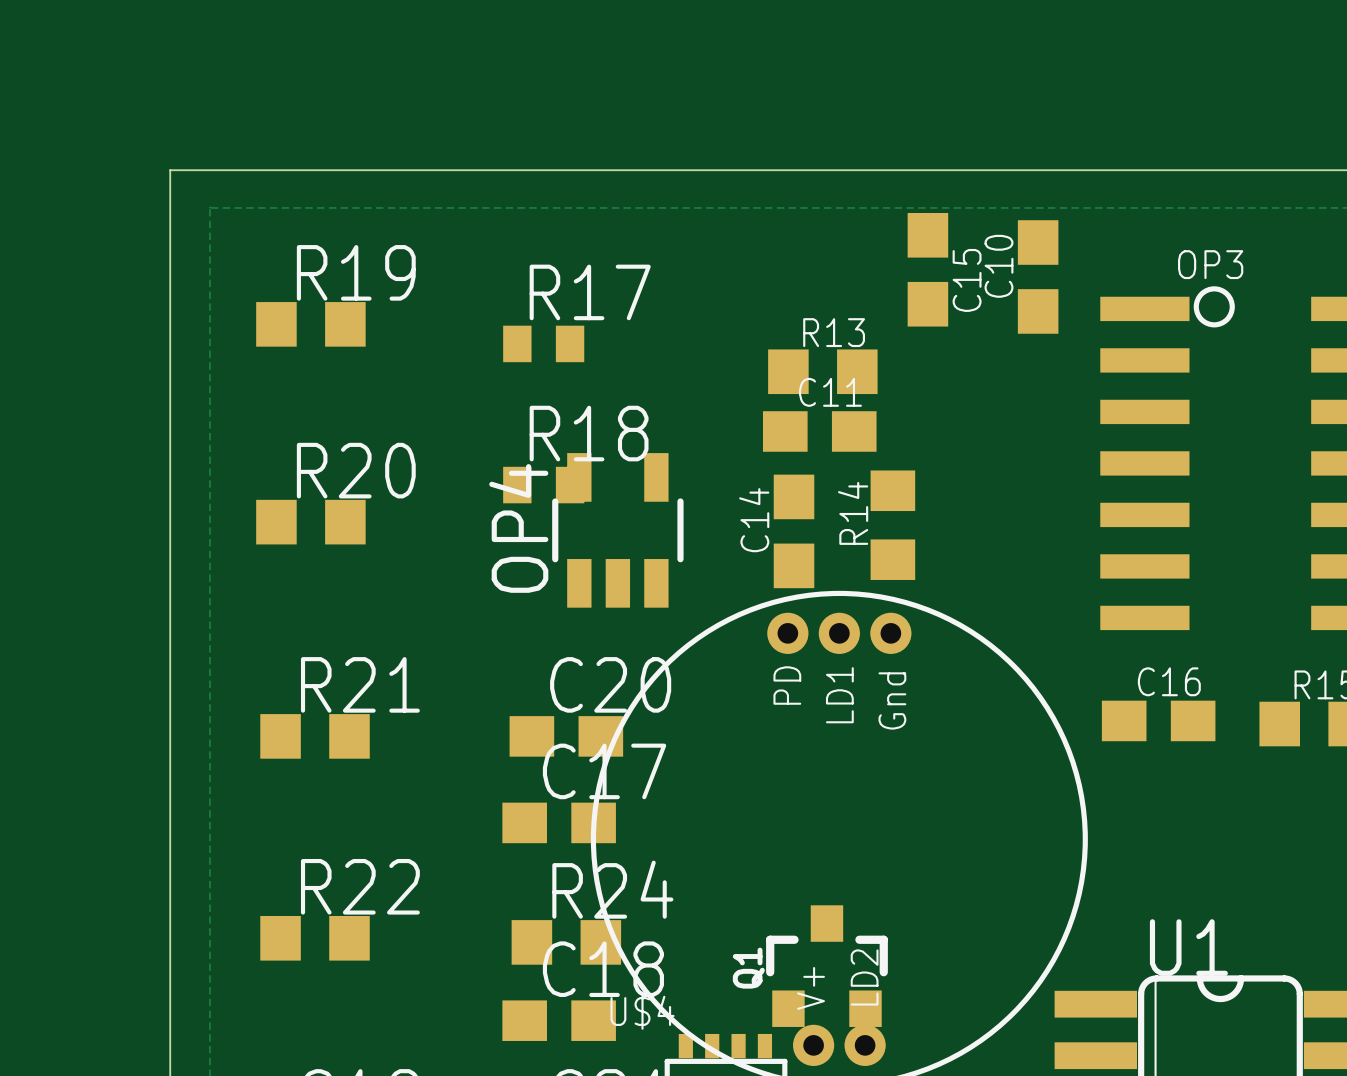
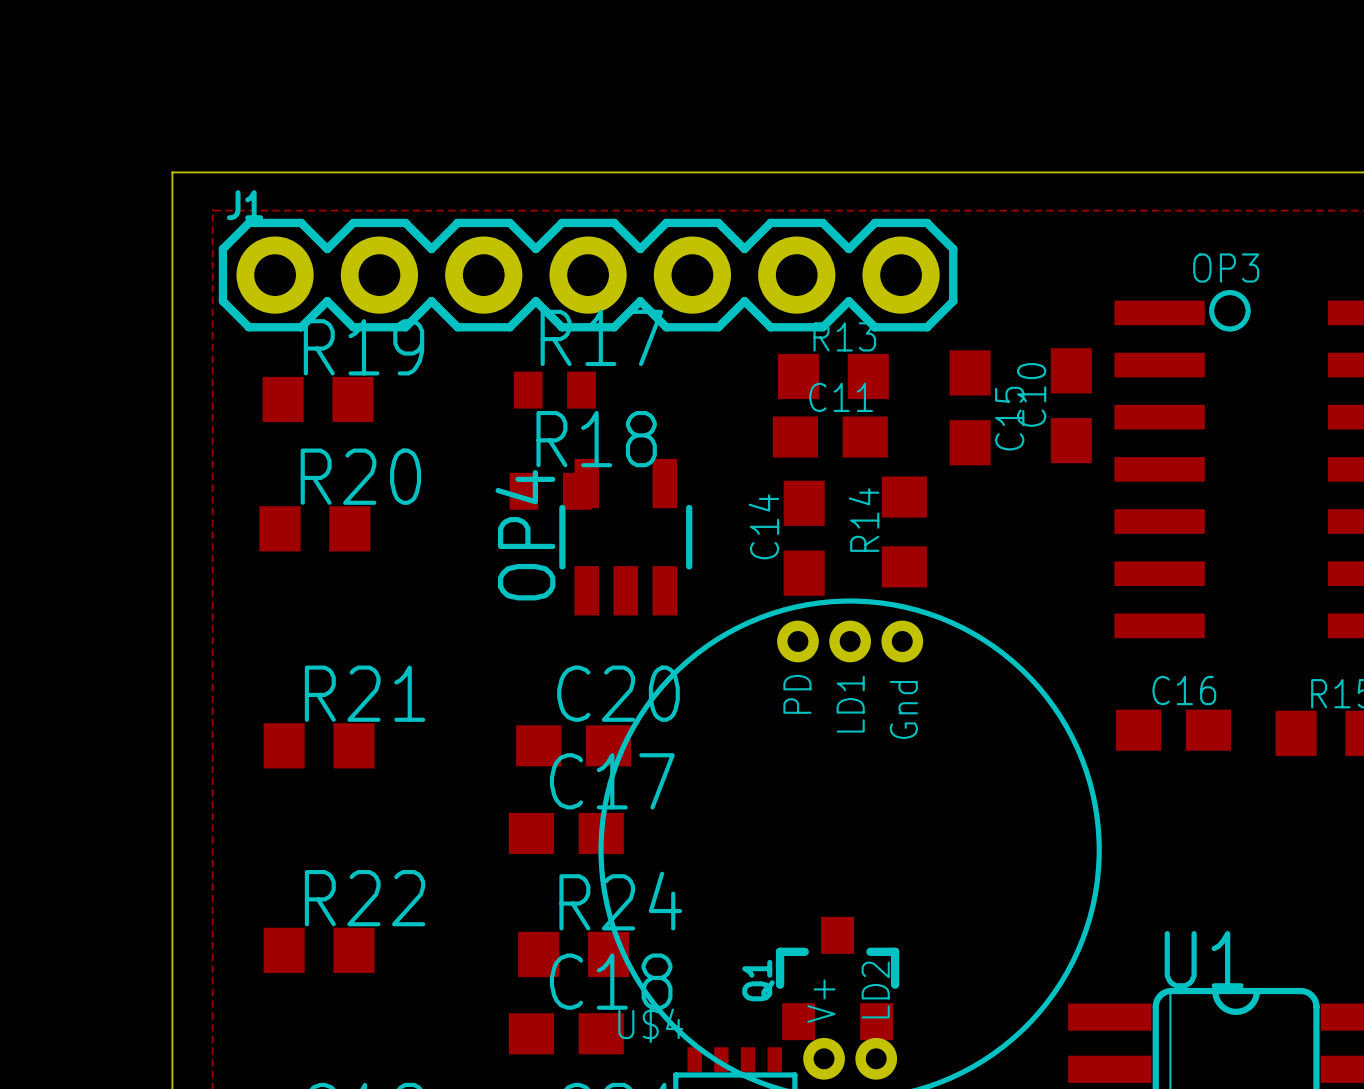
C15 position: (927, 269) -> (970, 407)
J1: none -> (588, 275)
C10 position: (1038, 276) -> (1071, 405)
R19 position: (310, 324) -> (318, 399)
R17 position: (543, 343) -> (554, 390)

